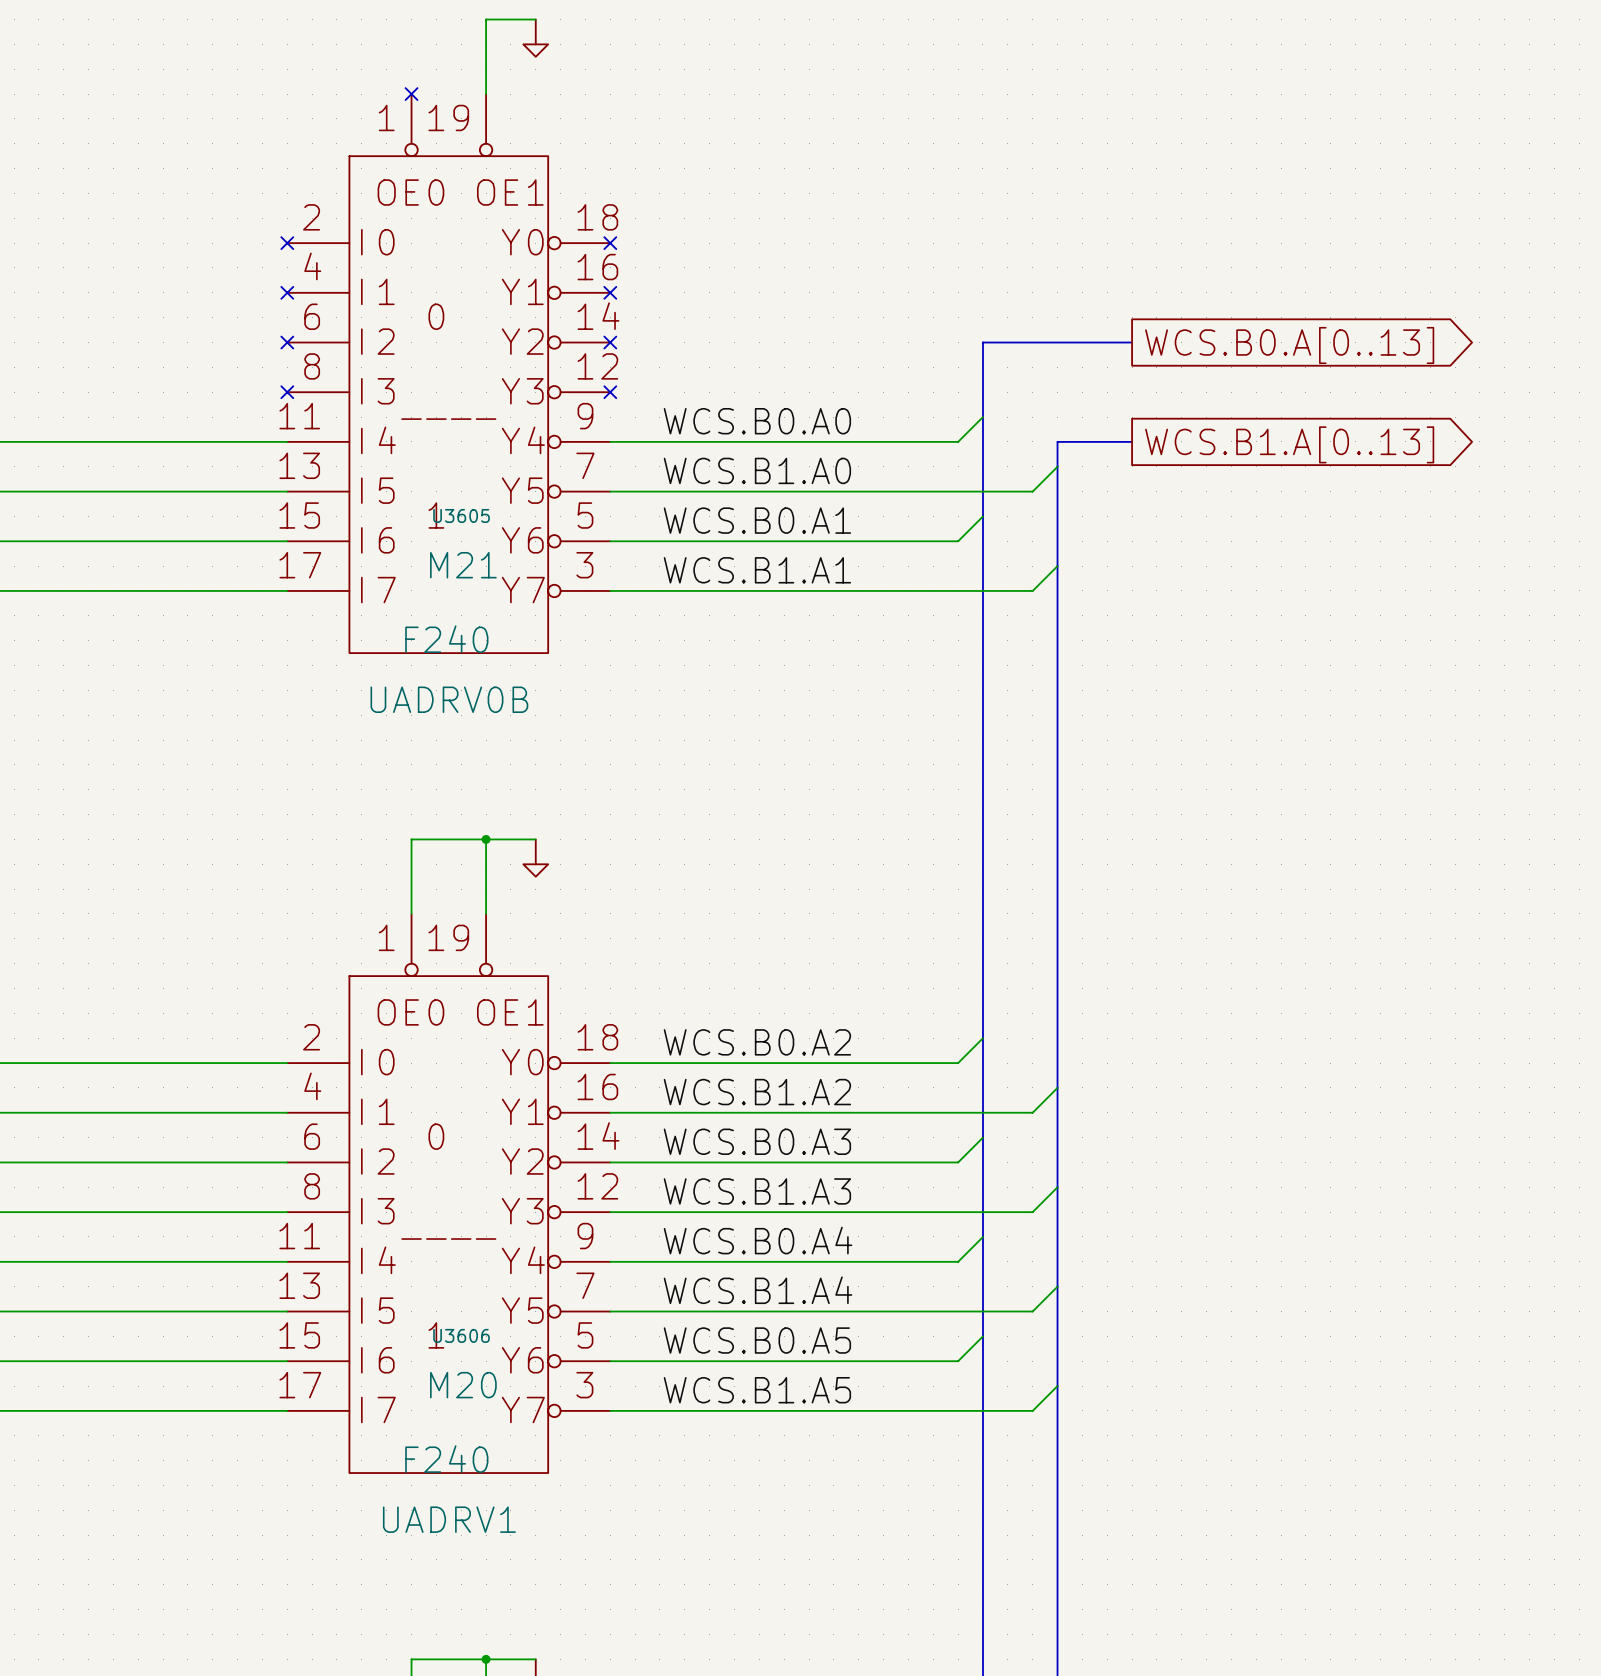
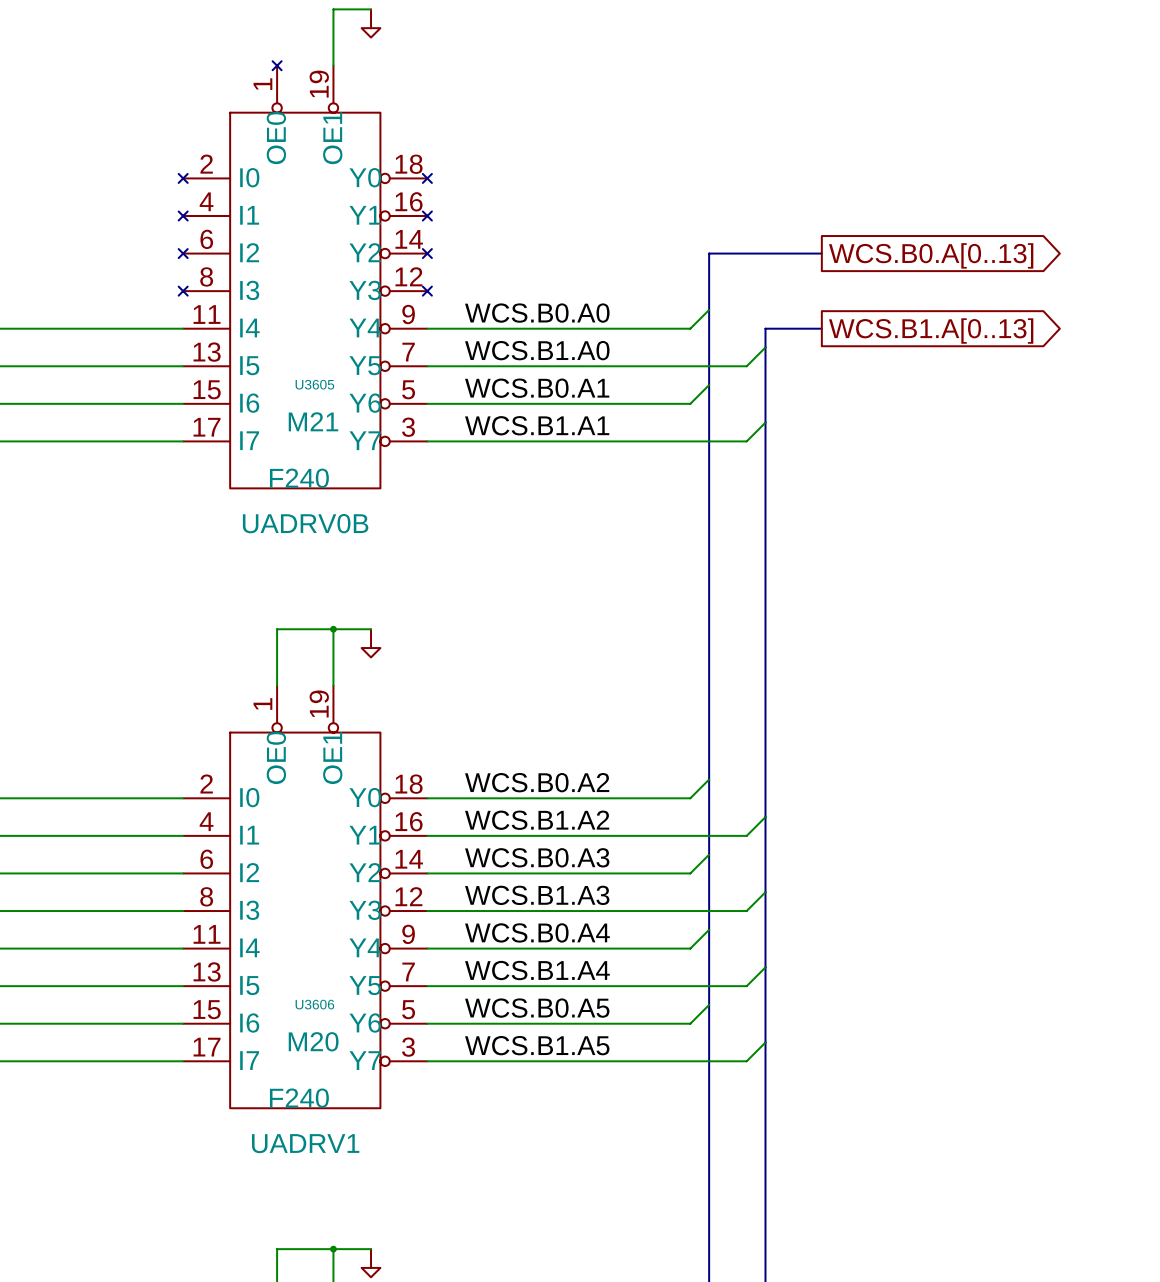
U3605 symbol: [287, 94, 611, 654] -> [183, 65, 428, 489]
U3606 symbol: [287, 913, 611, 1474] -> [183, 685, 428, 1109]

